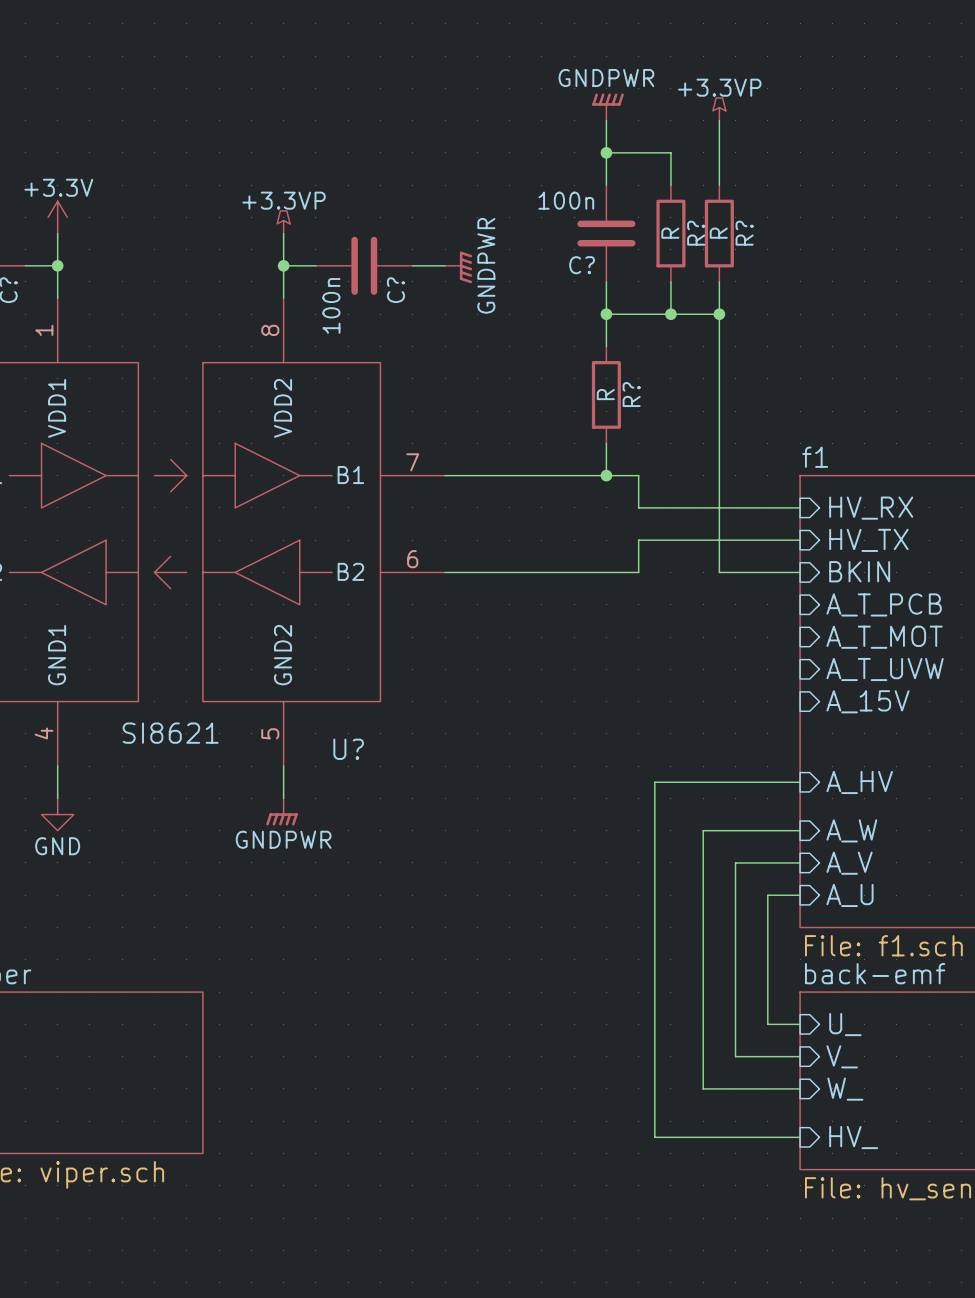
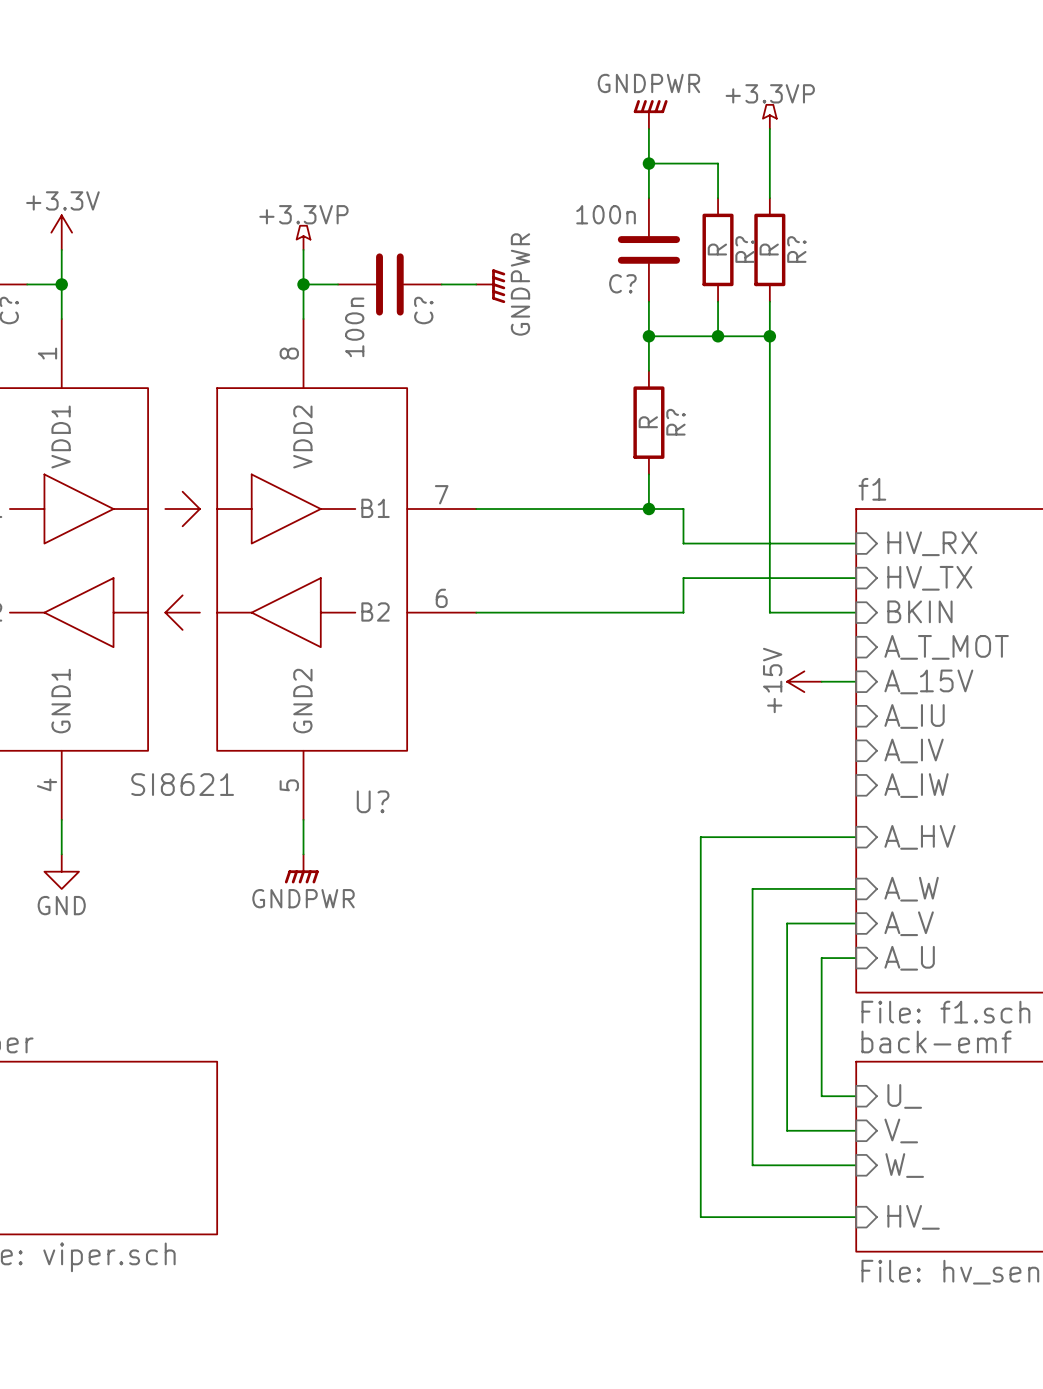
sheet pin: A_T_PCB (884, 604) -> A_T_MOT (946, 647)
power symbol: none -> +15V (804, 681)
wire: none -> (821, 681) (856, 681)
sheet pin: A_T_MOT (884, 637) -> A_15V (928, 681)
sheet pin: A_T_UVW (885, 669) -> A_IU (914, 716)
sheet pin: A_15V (867, 701) -> A_IV (914, 751)
sheet pin: none -> A_IW (916, 785)

